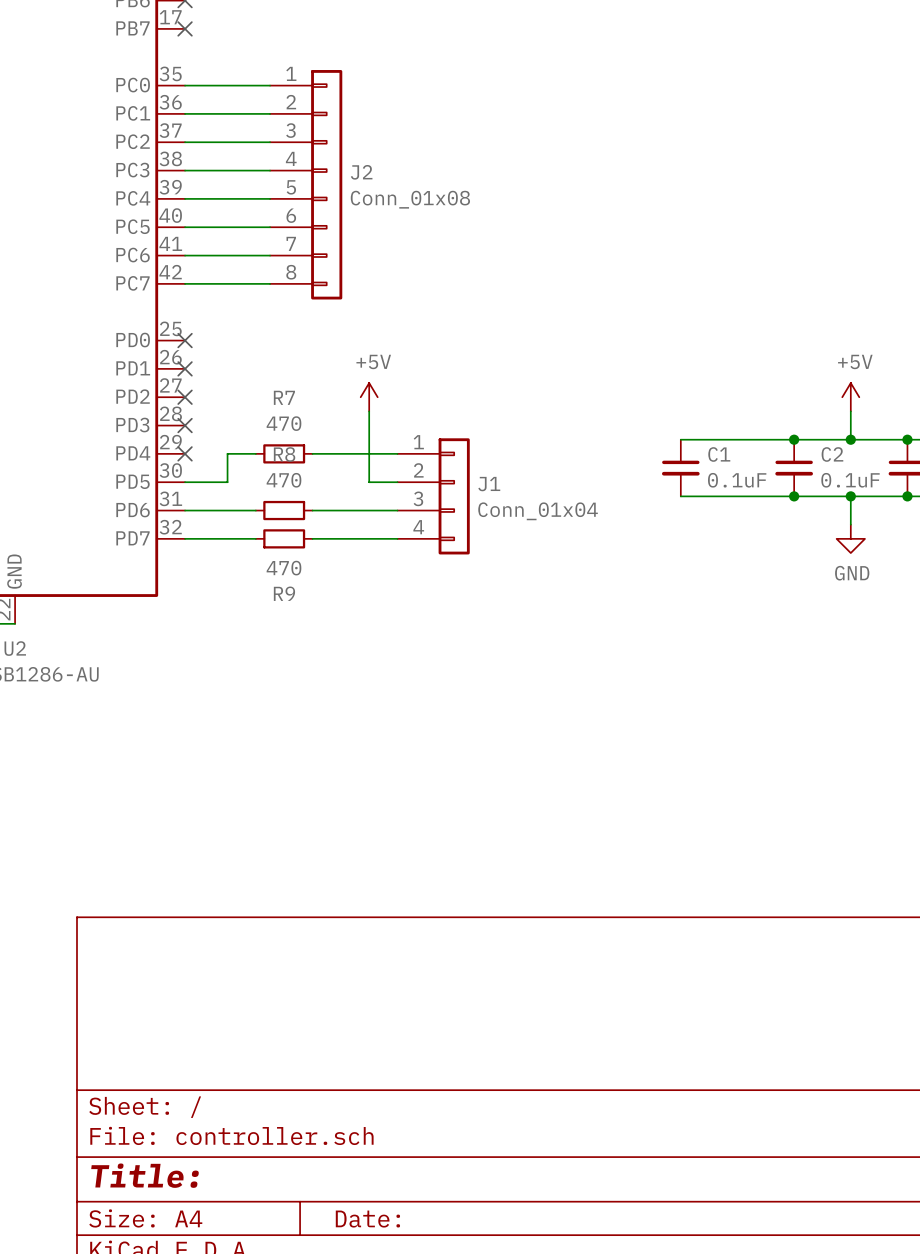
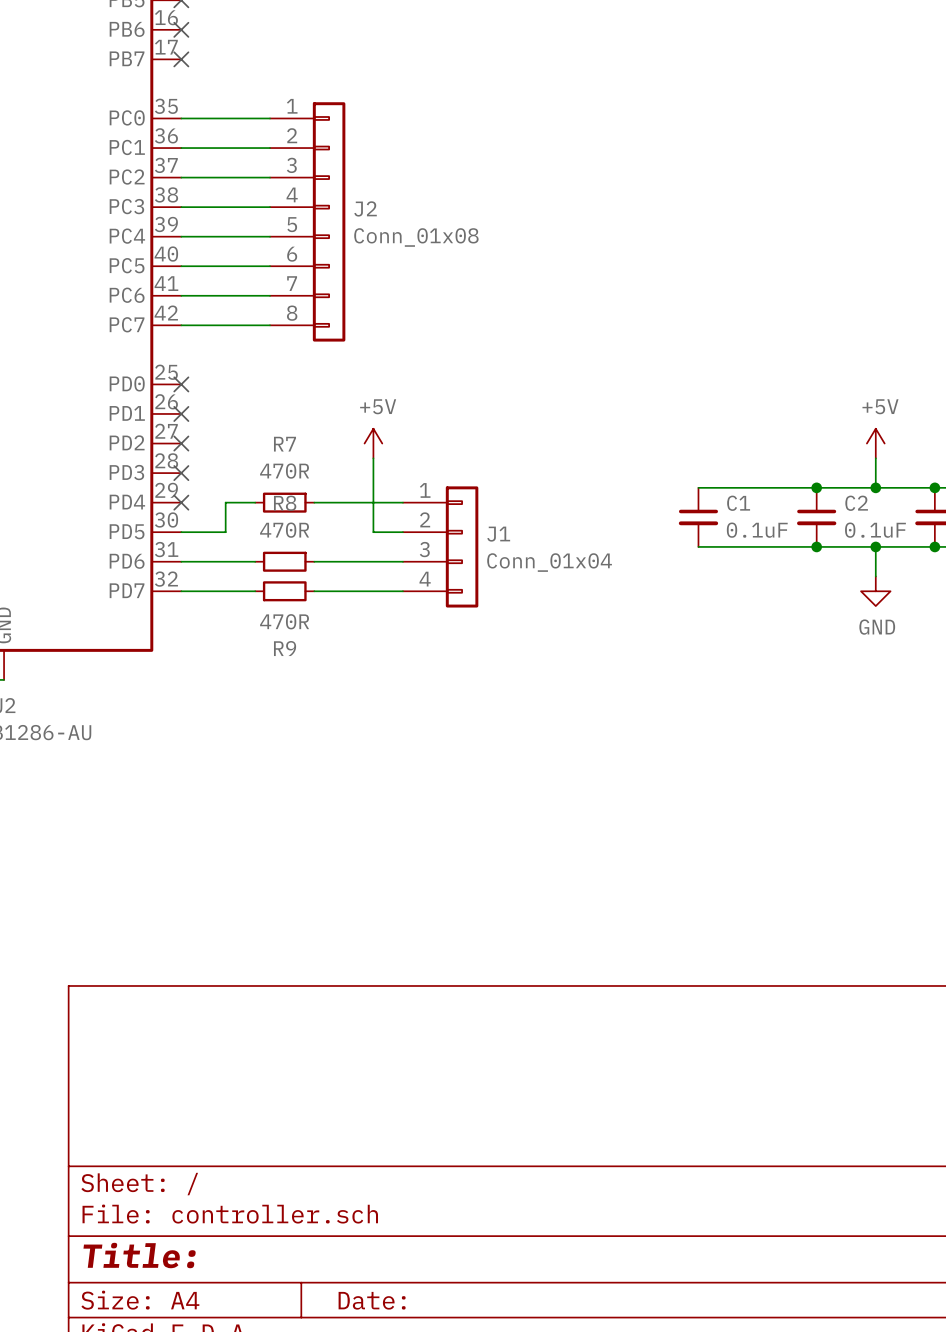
R7 value: 470 (283, 423) -> 470R (284, 471)
R8 value: 470 (283, 480) -> 470R (284, 530)
R9 value: 470 (283, 568) -> 470R (284, 621)

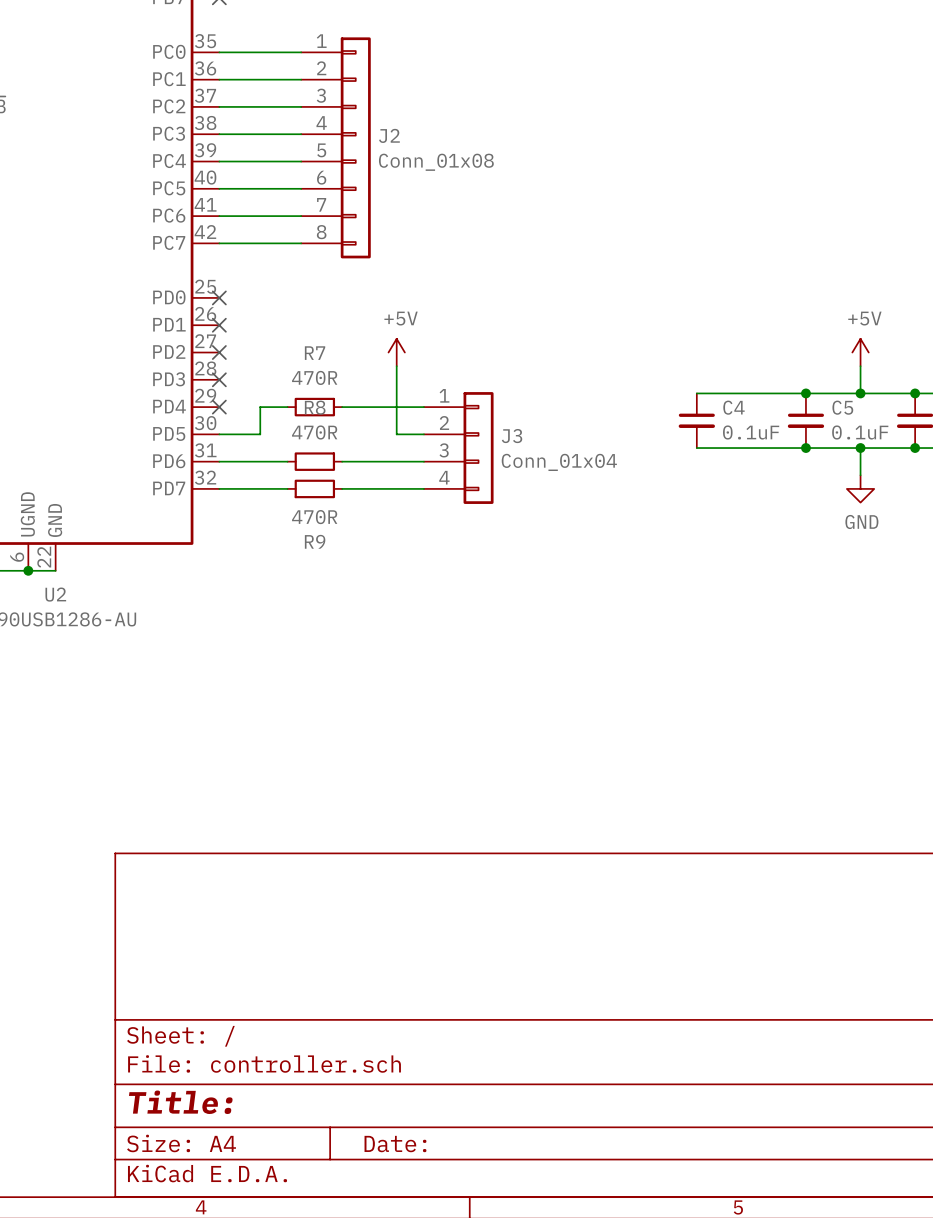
C1 name: C1 (738, 503) -> C4 (733, 407)
C2 name: C2 (856, 503) -> C5 (842, 407)
J1 name: J1 (498, 534) -> J3 (512, 436)

